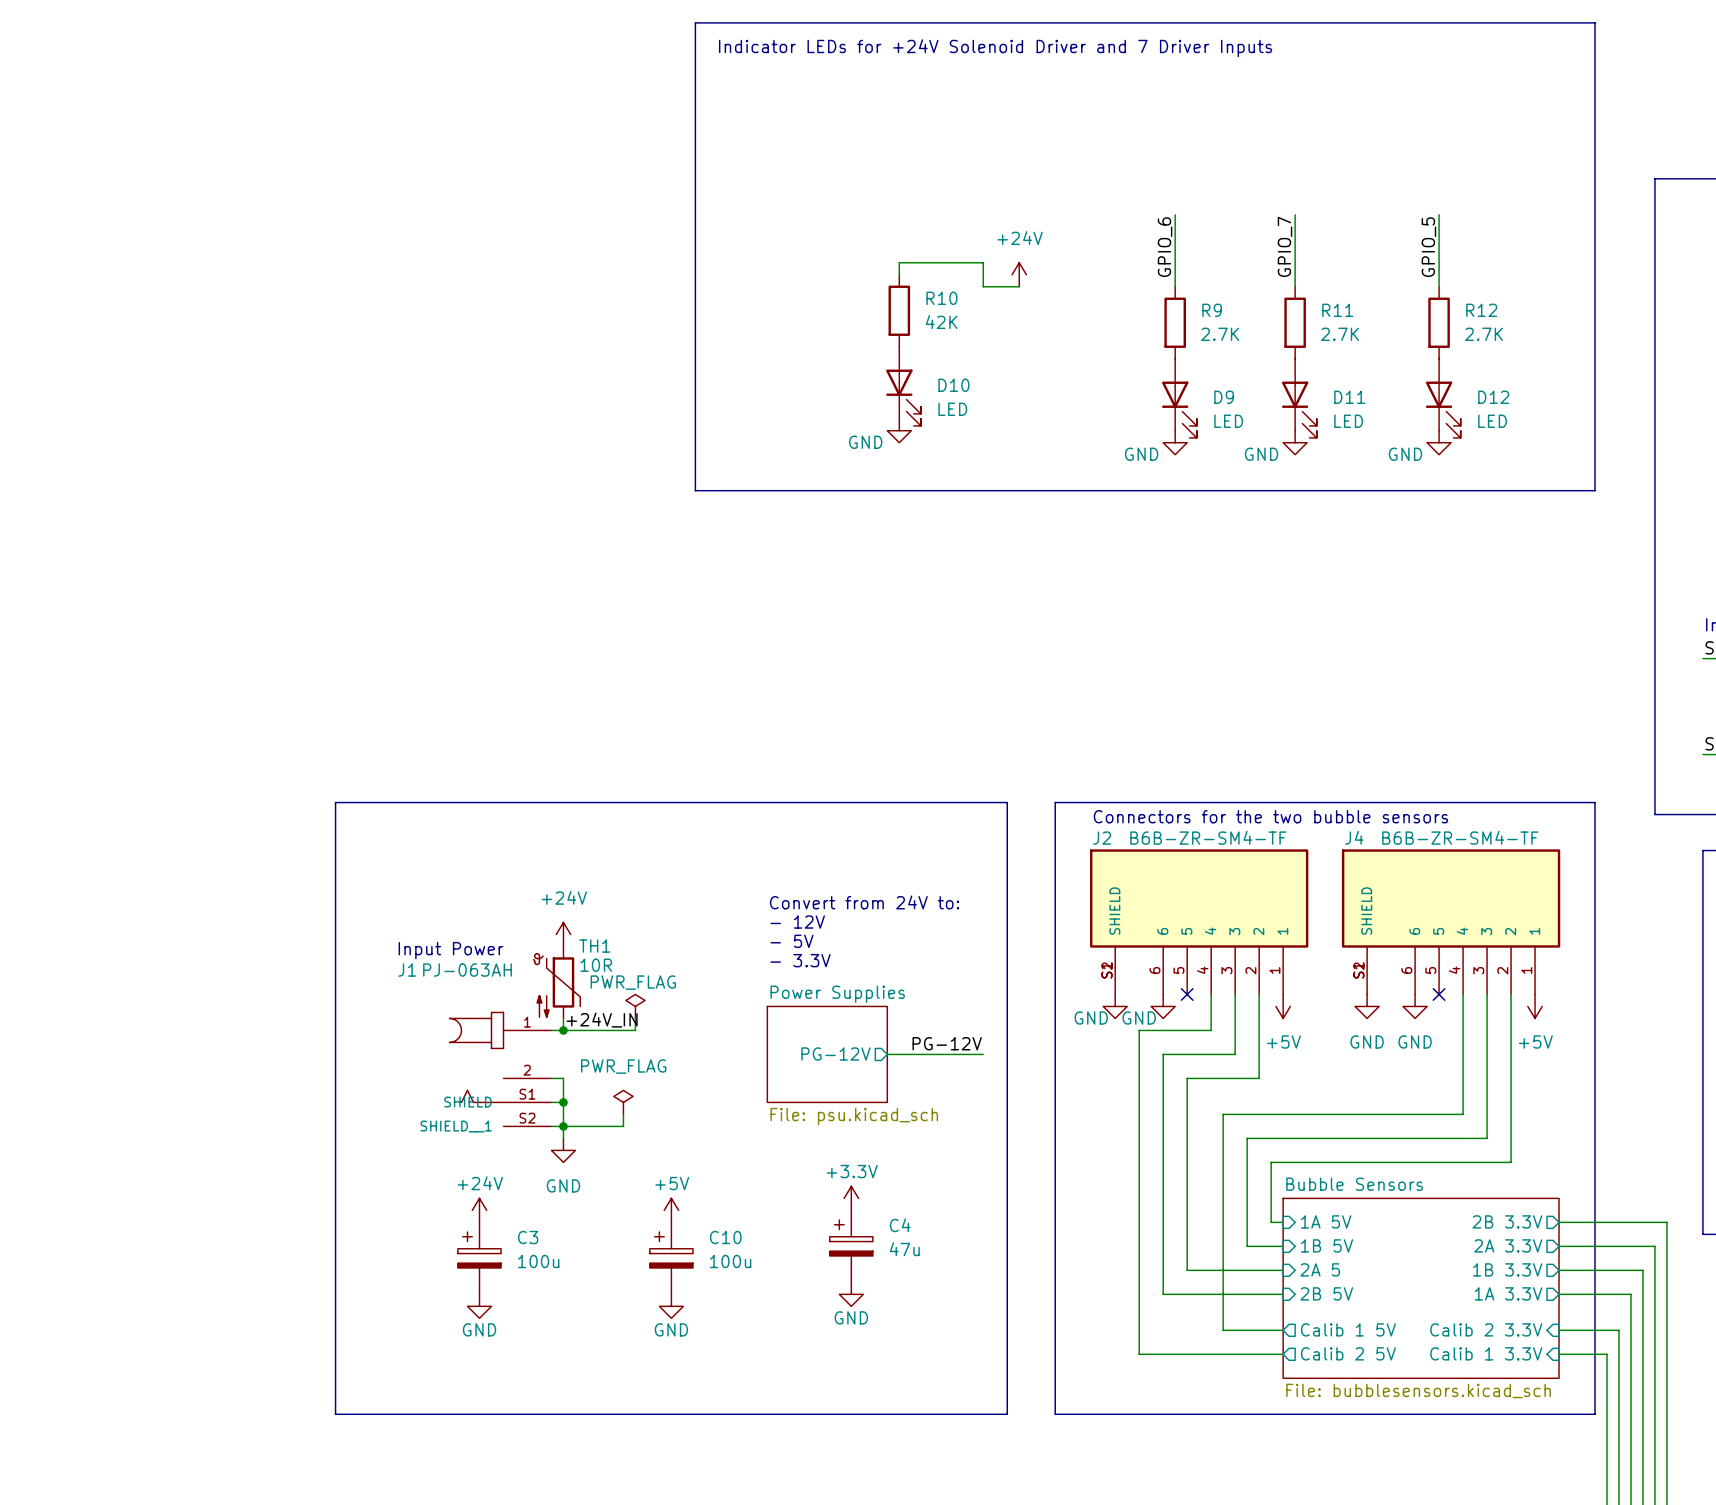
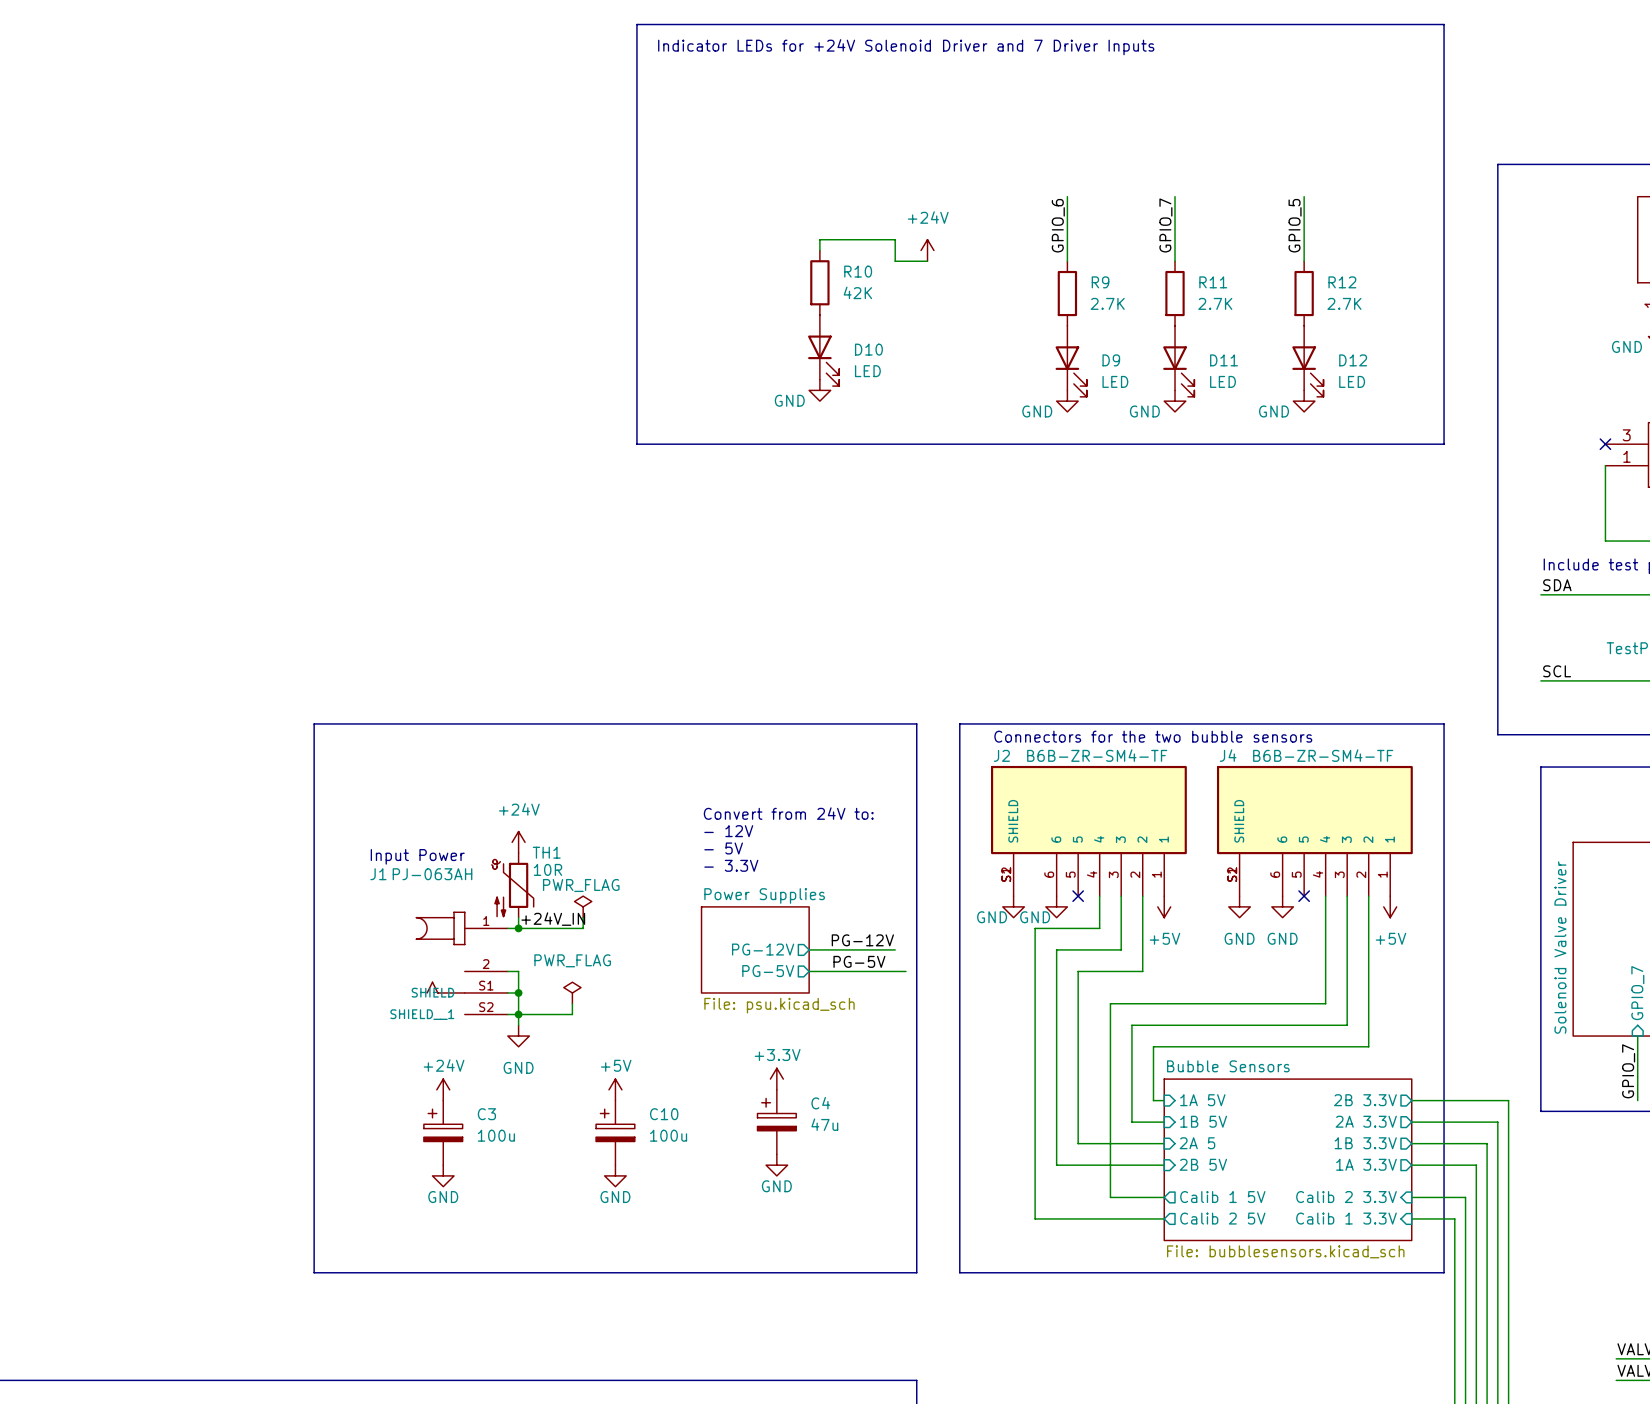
label: none -> PG-5V (859, 961)
sheet pin: none -> PG-5V (768, 971)
wire: none -> (809, 971) (905, 971)

